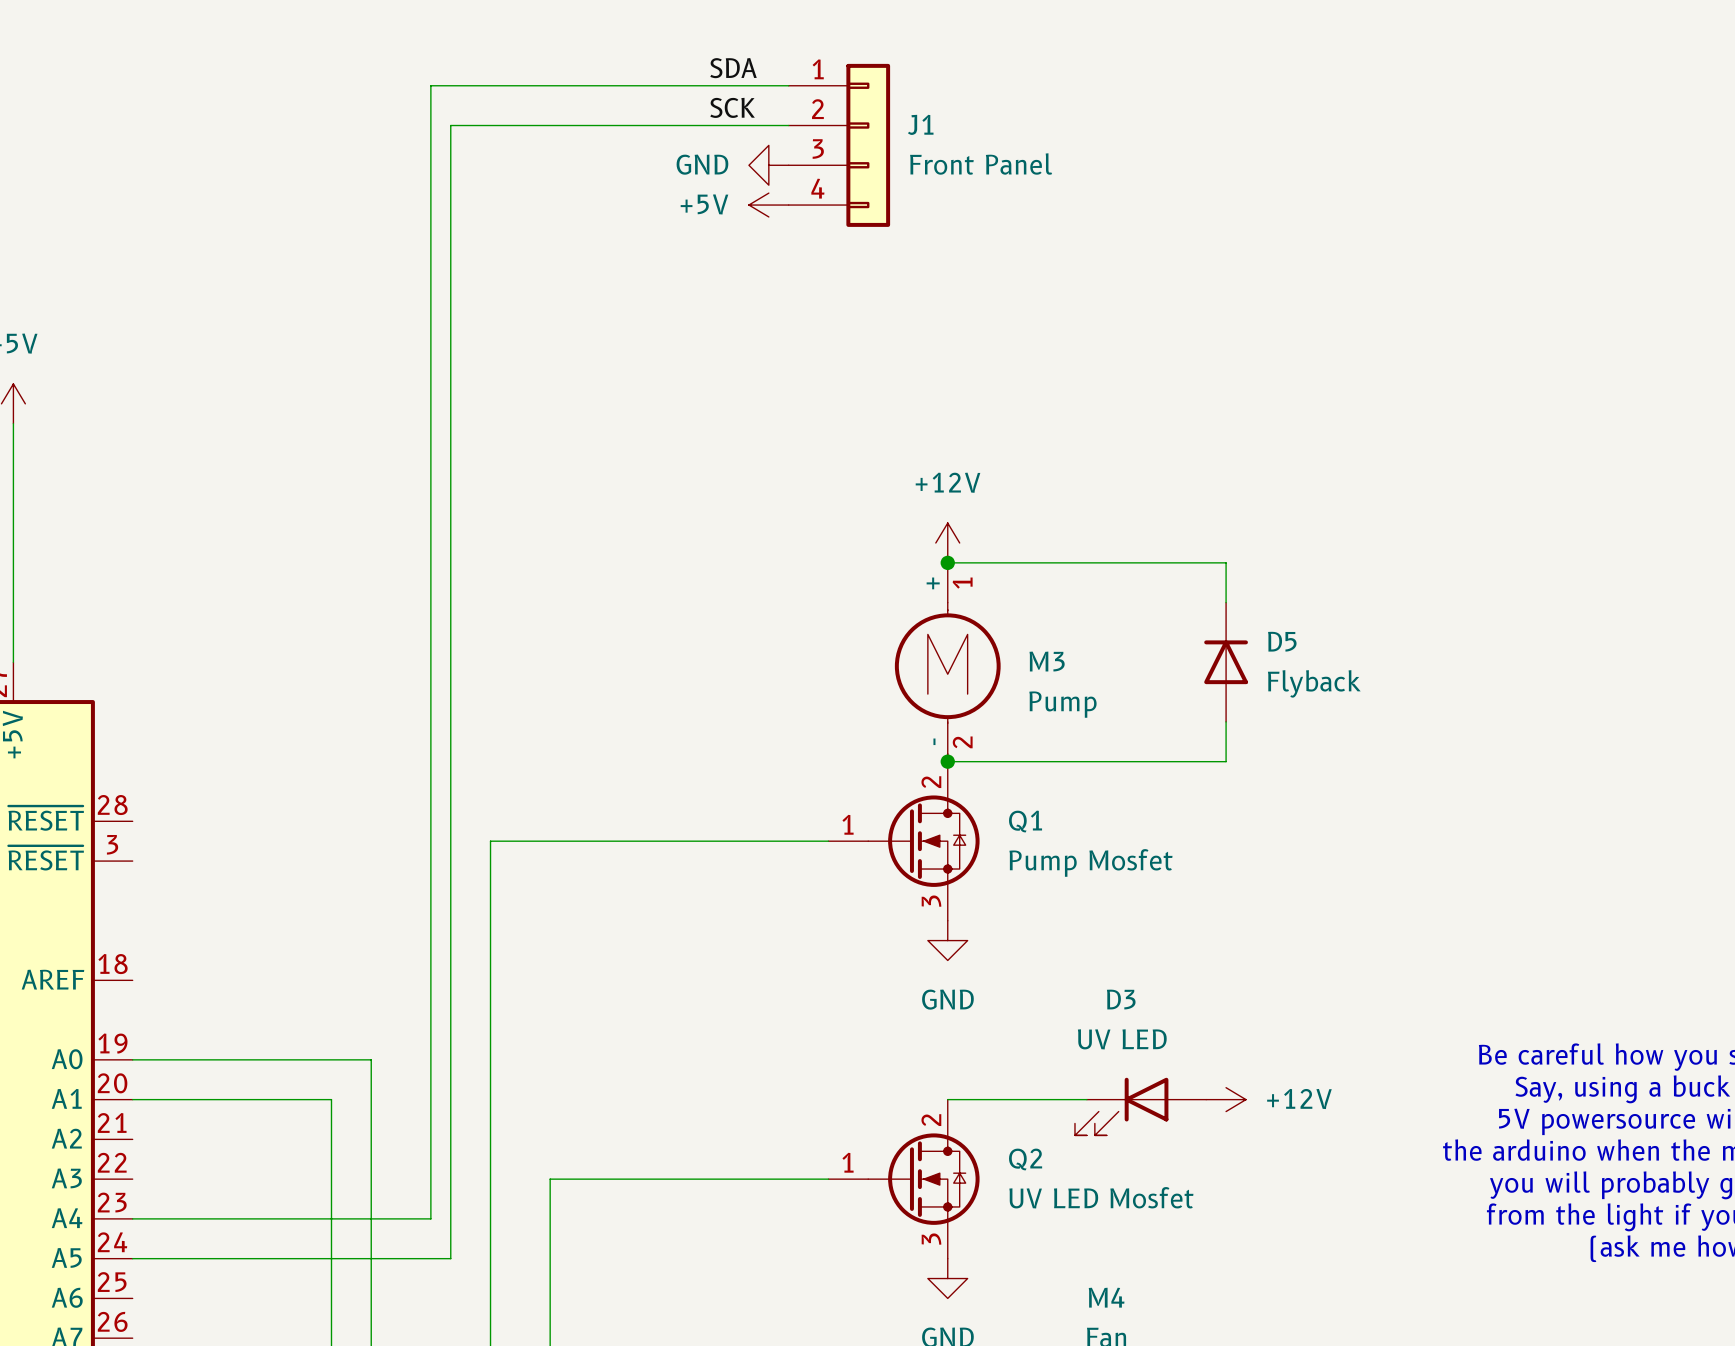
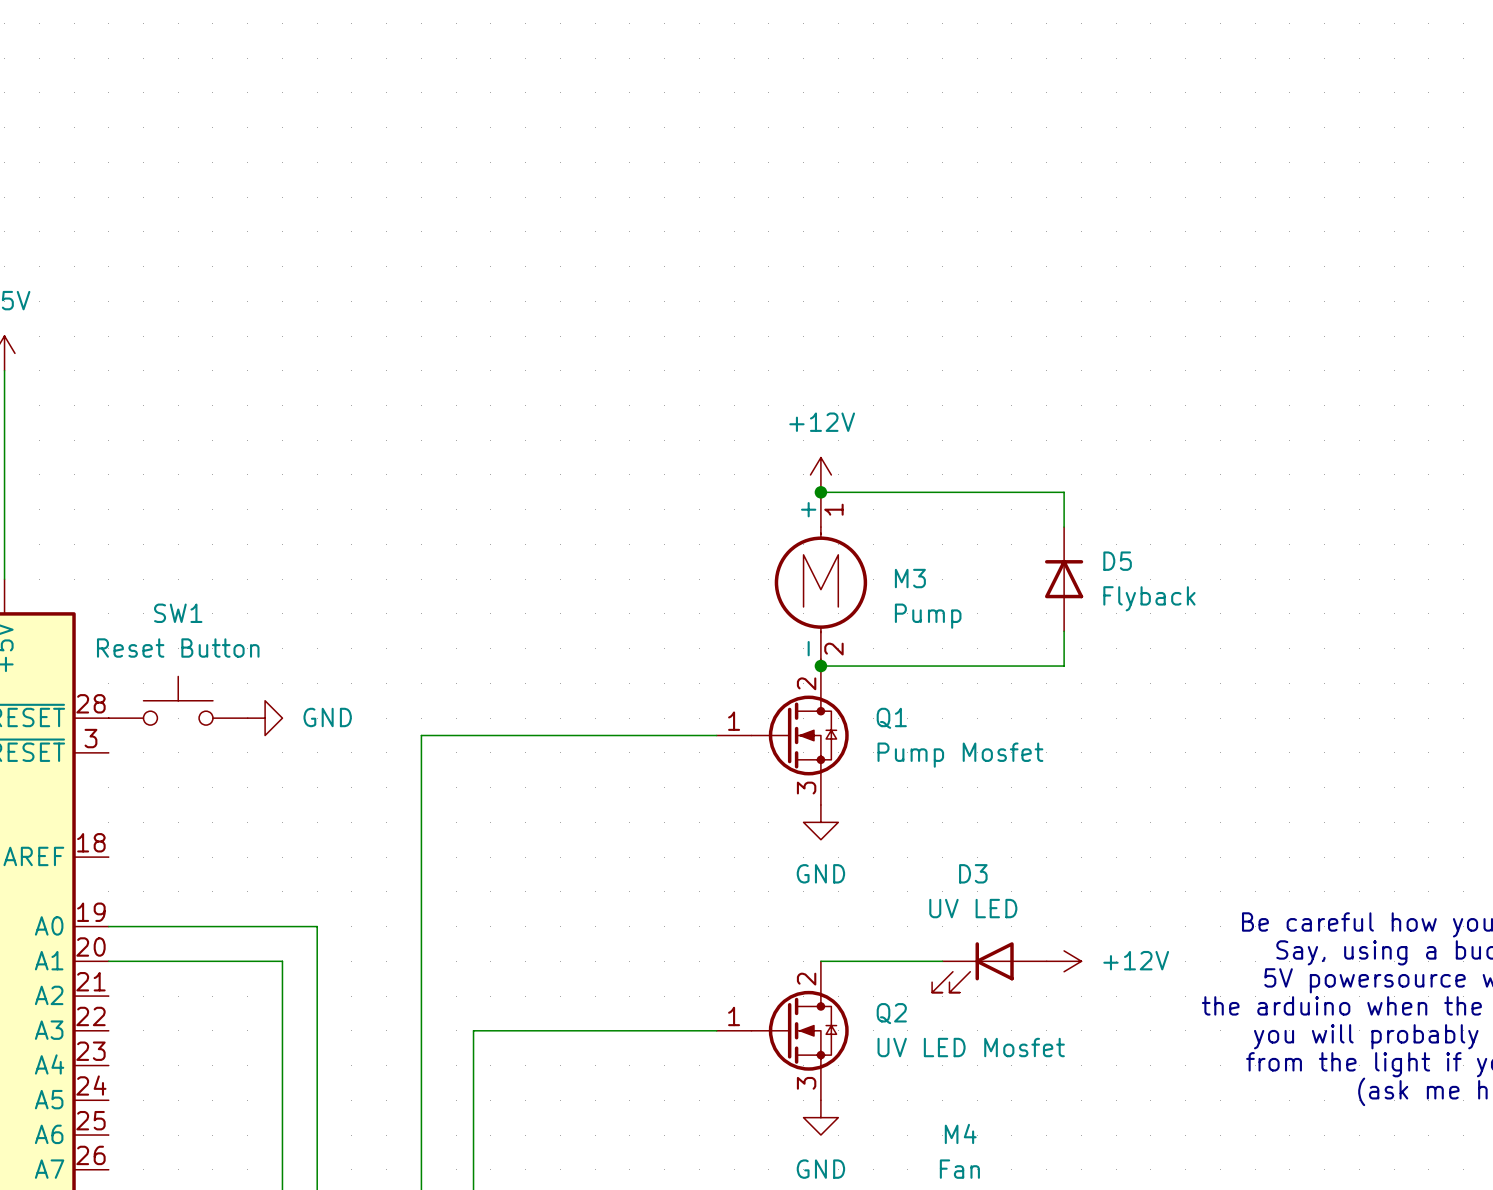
label: SDA (733, 68) -> none
wire: (788, 85) (430, 85) (430, 1218) (132, 1218) -> none
label: SCK (732, 107) -> none
wire: (788, 125) (450, 125) (450, 1258) (132, 1258) -> none
J1: Front Panel (839, 145) -> none
power symbol: GND (768, 165) -> none
power symbol: +5V (768, 205) -> none
SW1: none -> Reset Button (178, 700)
power symbol: none -> GND (265, 718)

